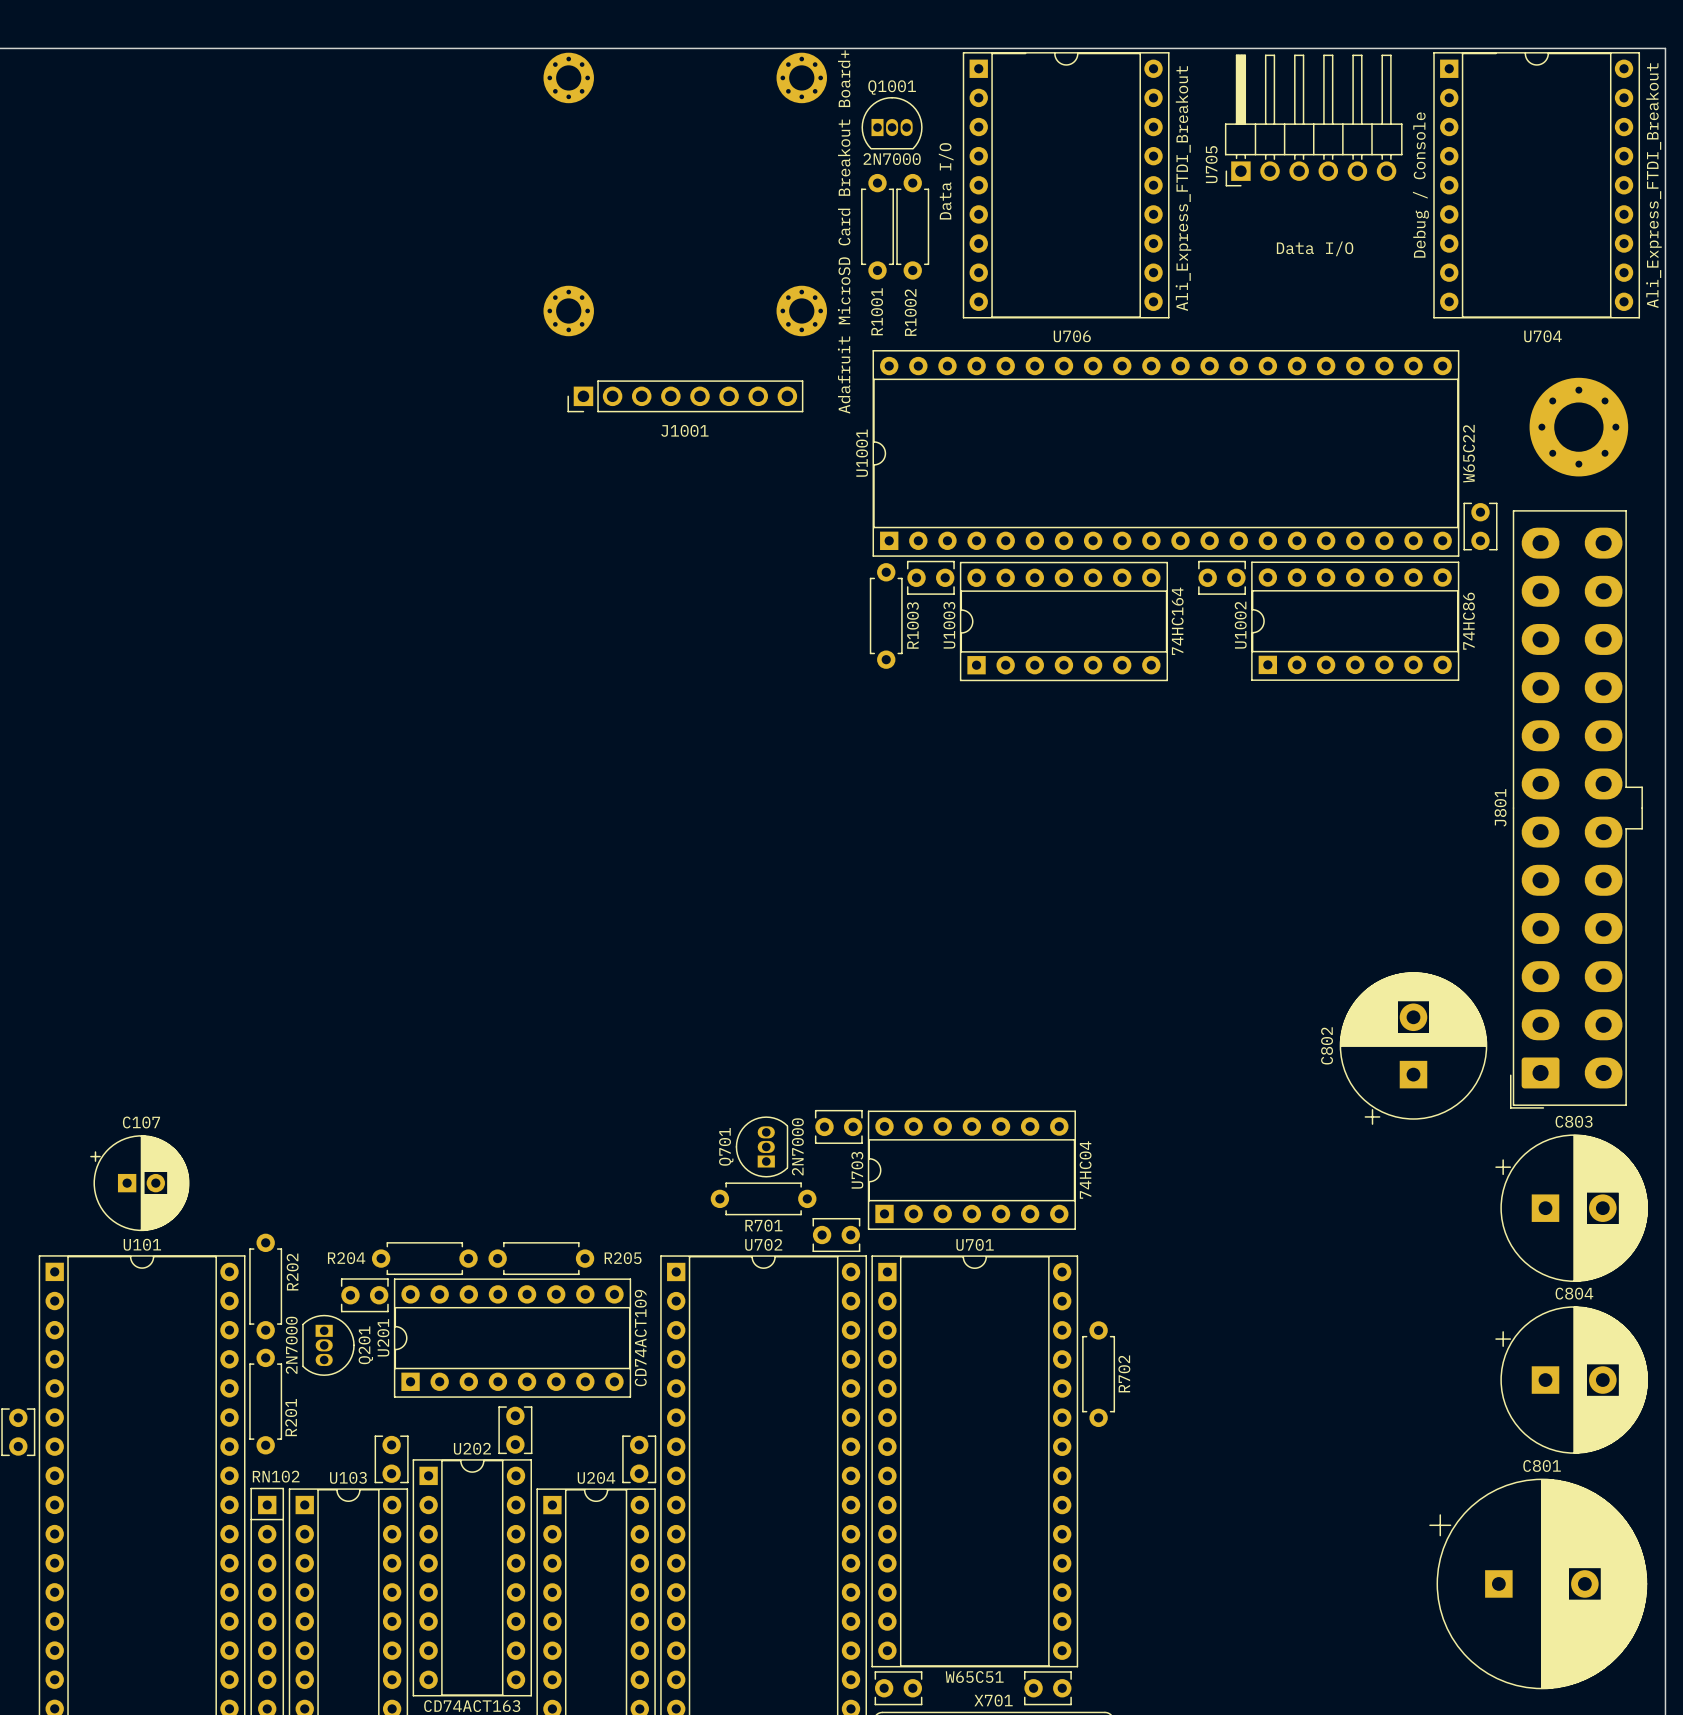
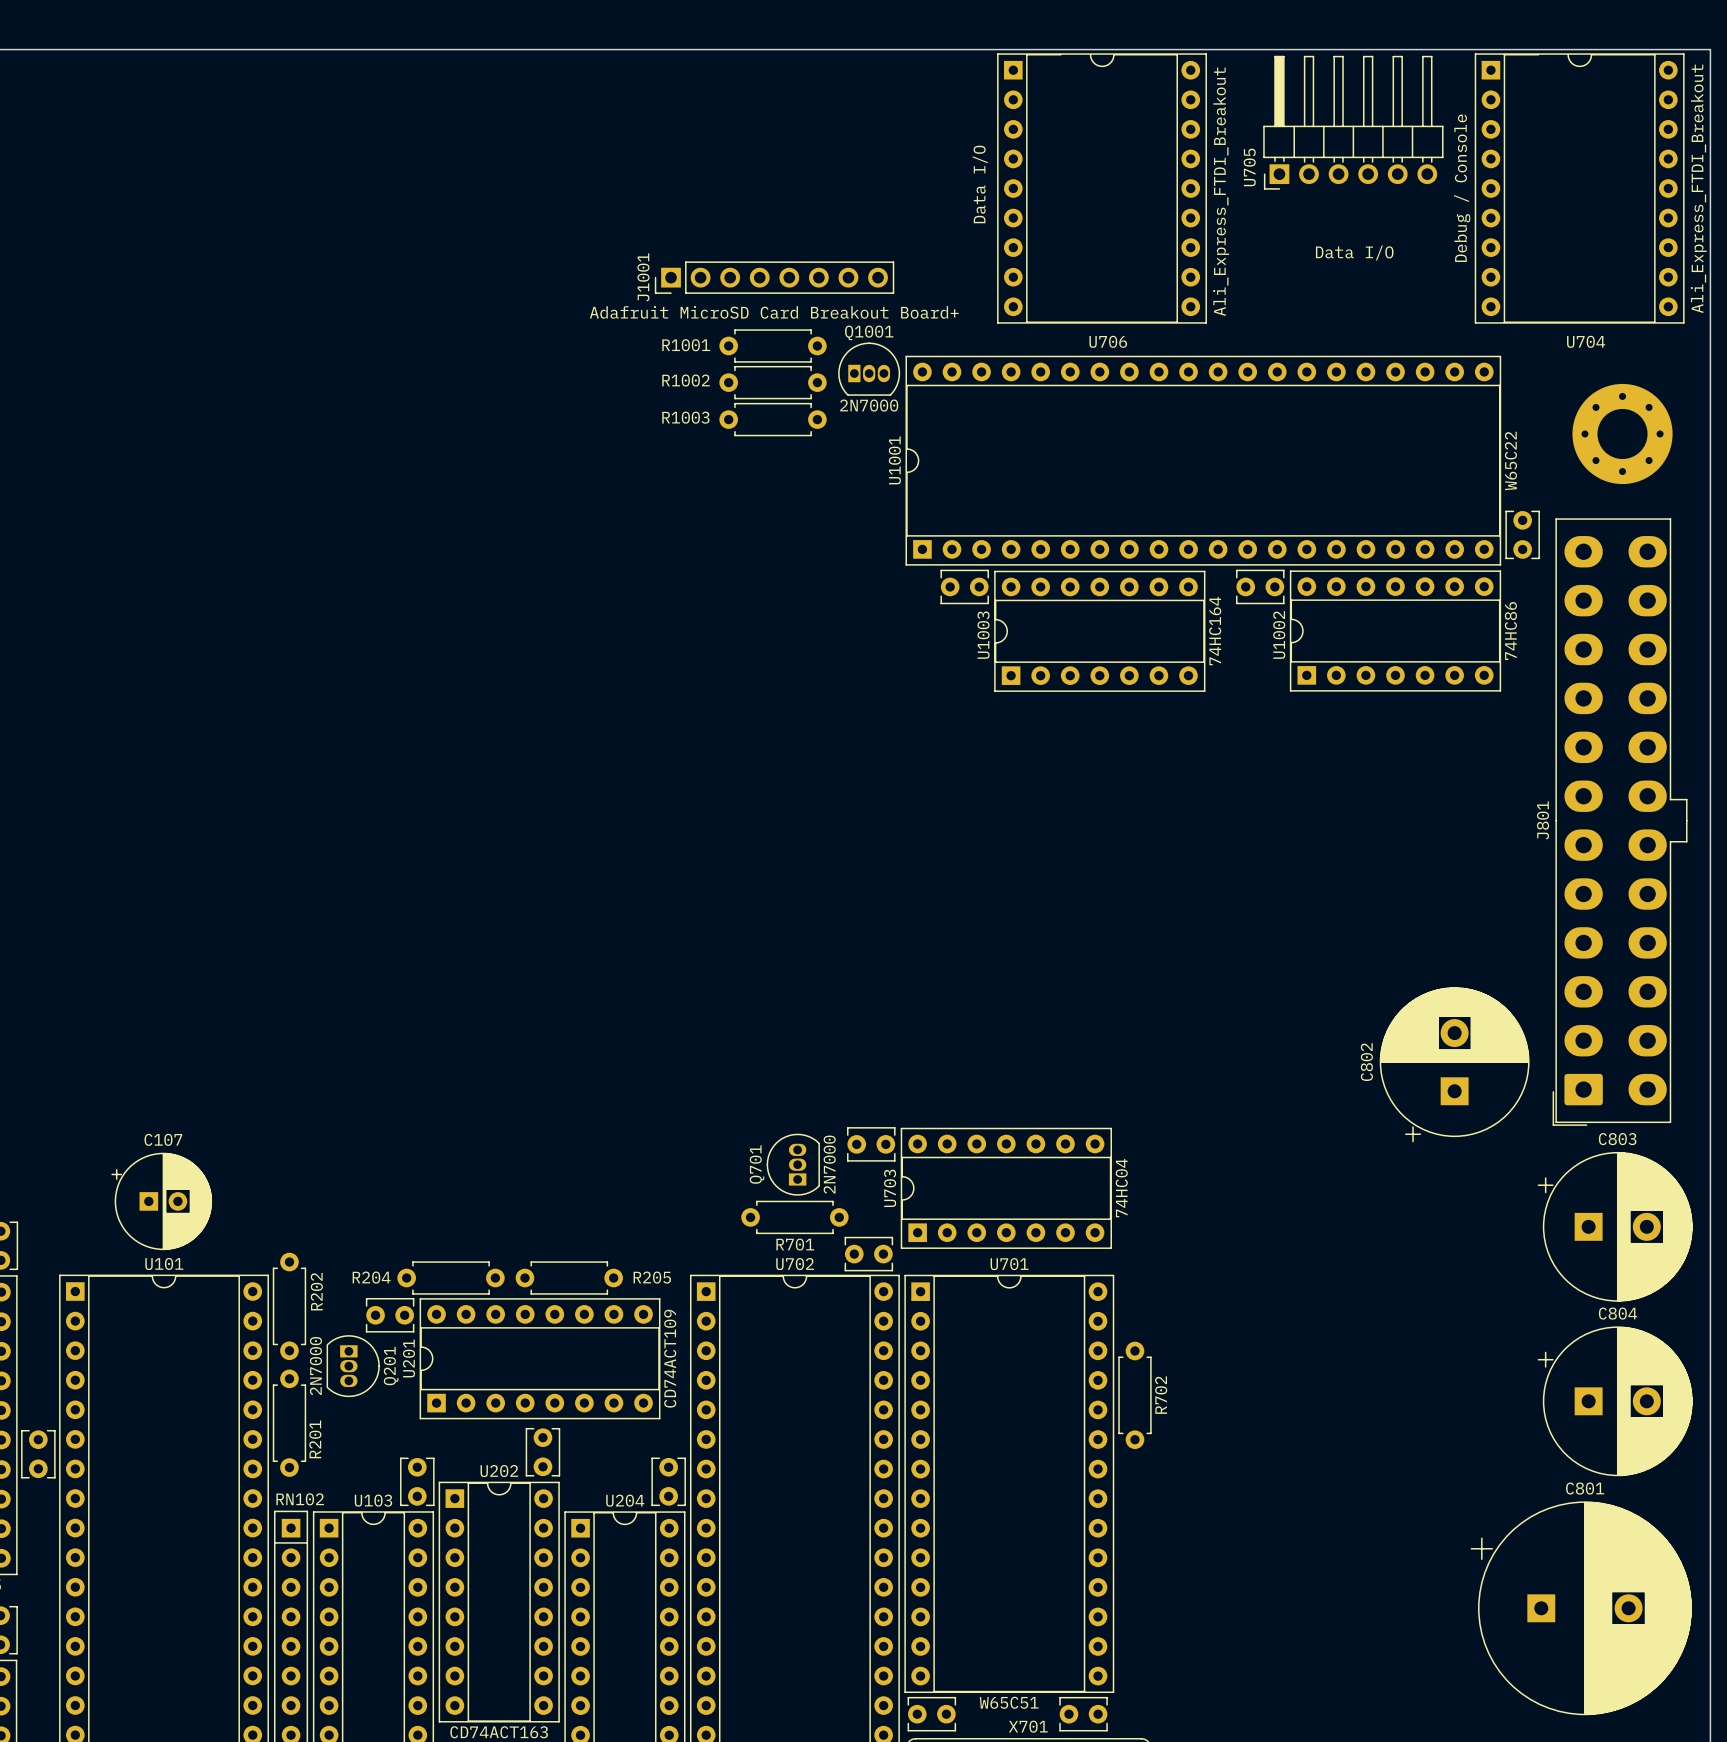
part: (568, 77) -> none
part: (801, 77) -> none
Q1001 position: (892, 123) -> (869, 369)
R1001 rotation: 0° (877, 226) -> 90° clockwise (773, 345)
R1001 position: (877, 226) -> (773, 345)
R1002 rotation: 0° (912, 226) -> 90° clockwise (773, 382)
R1002 position: (912, 226) -> (773, 382)
J1001 value rotation: 0° (844, 232) -> 90° clockwise (774, 312)
part: (568, 310) -> none
part: (801, 310) -> none
J1001 position: (685, 396) -> (774, 277)
J1001 name rotation: 0° (684, 430) -> 90° counterclockwise (643, 277)
J1001 name position: J1001 (684, 430) -> J1001 (643, 277)
R1003 rotation: 0° (886, 615) -> 90° clockwise (773, 419)
R1003 position: (886, 615) -> (773, 419)
R1003 name position: R1003 (912, 625) -> R1003 (685, 417)

